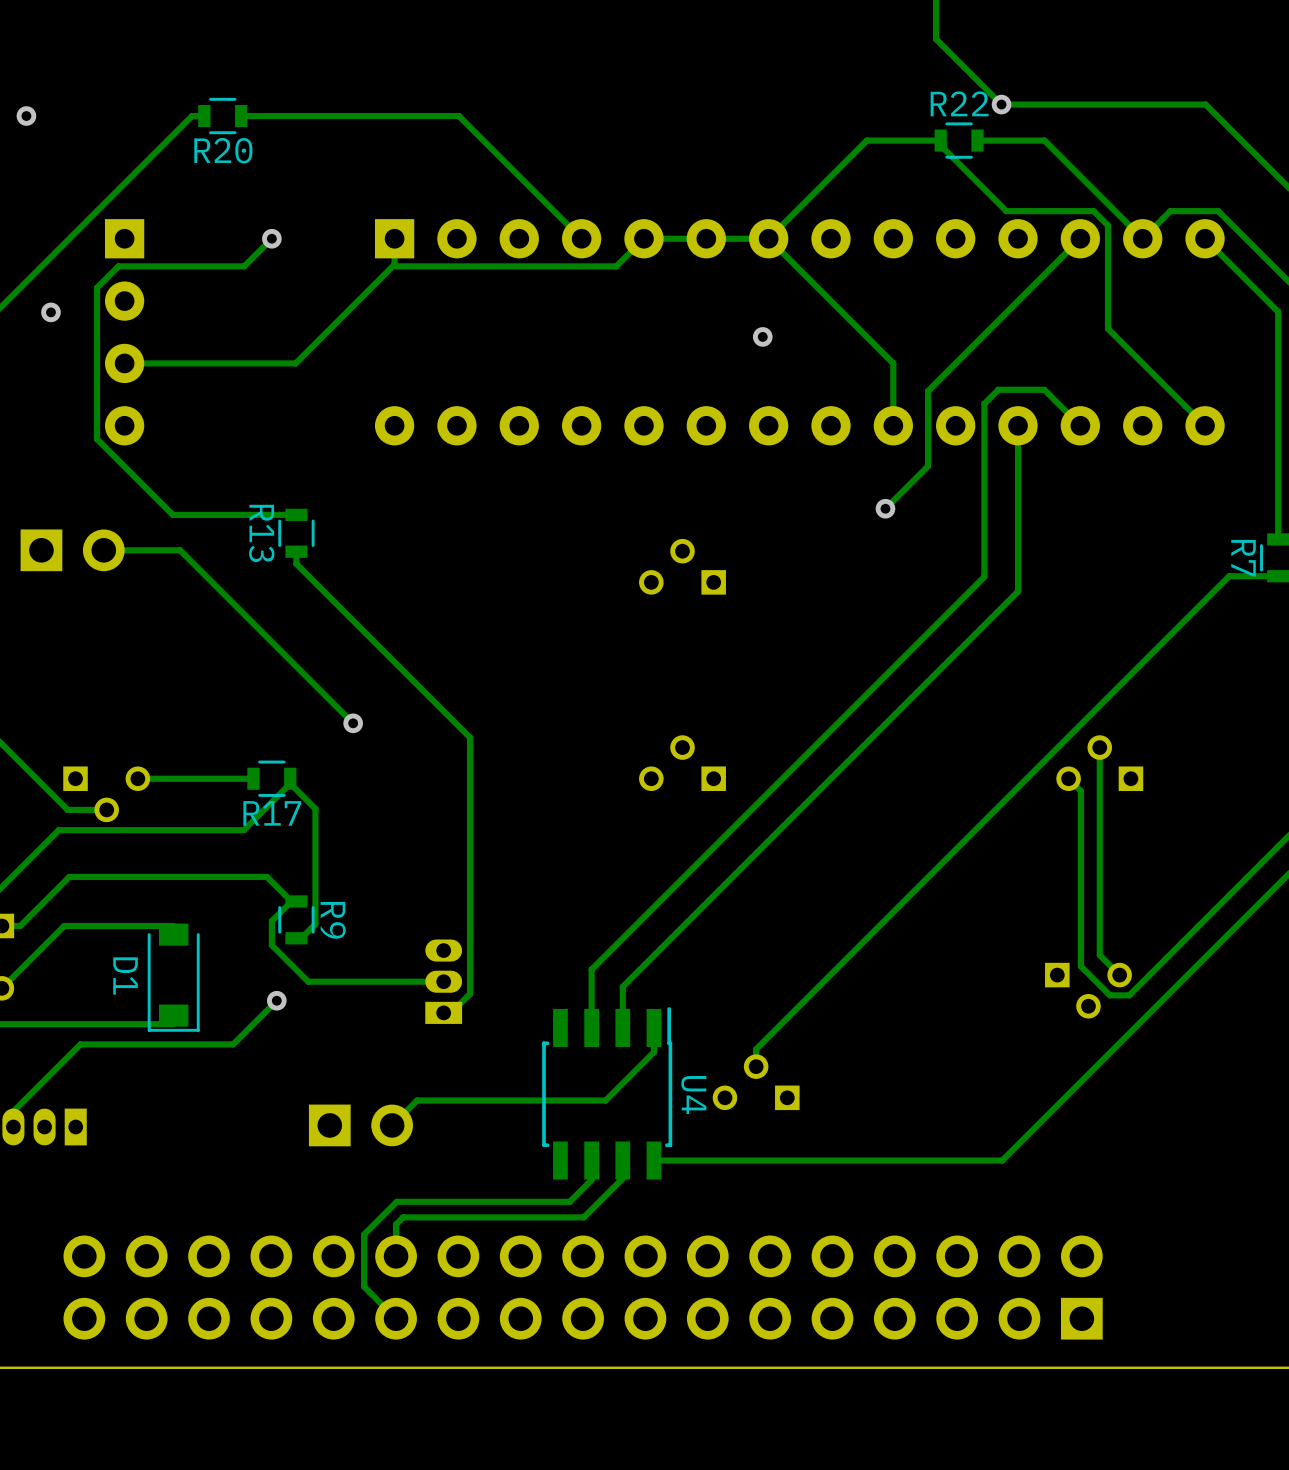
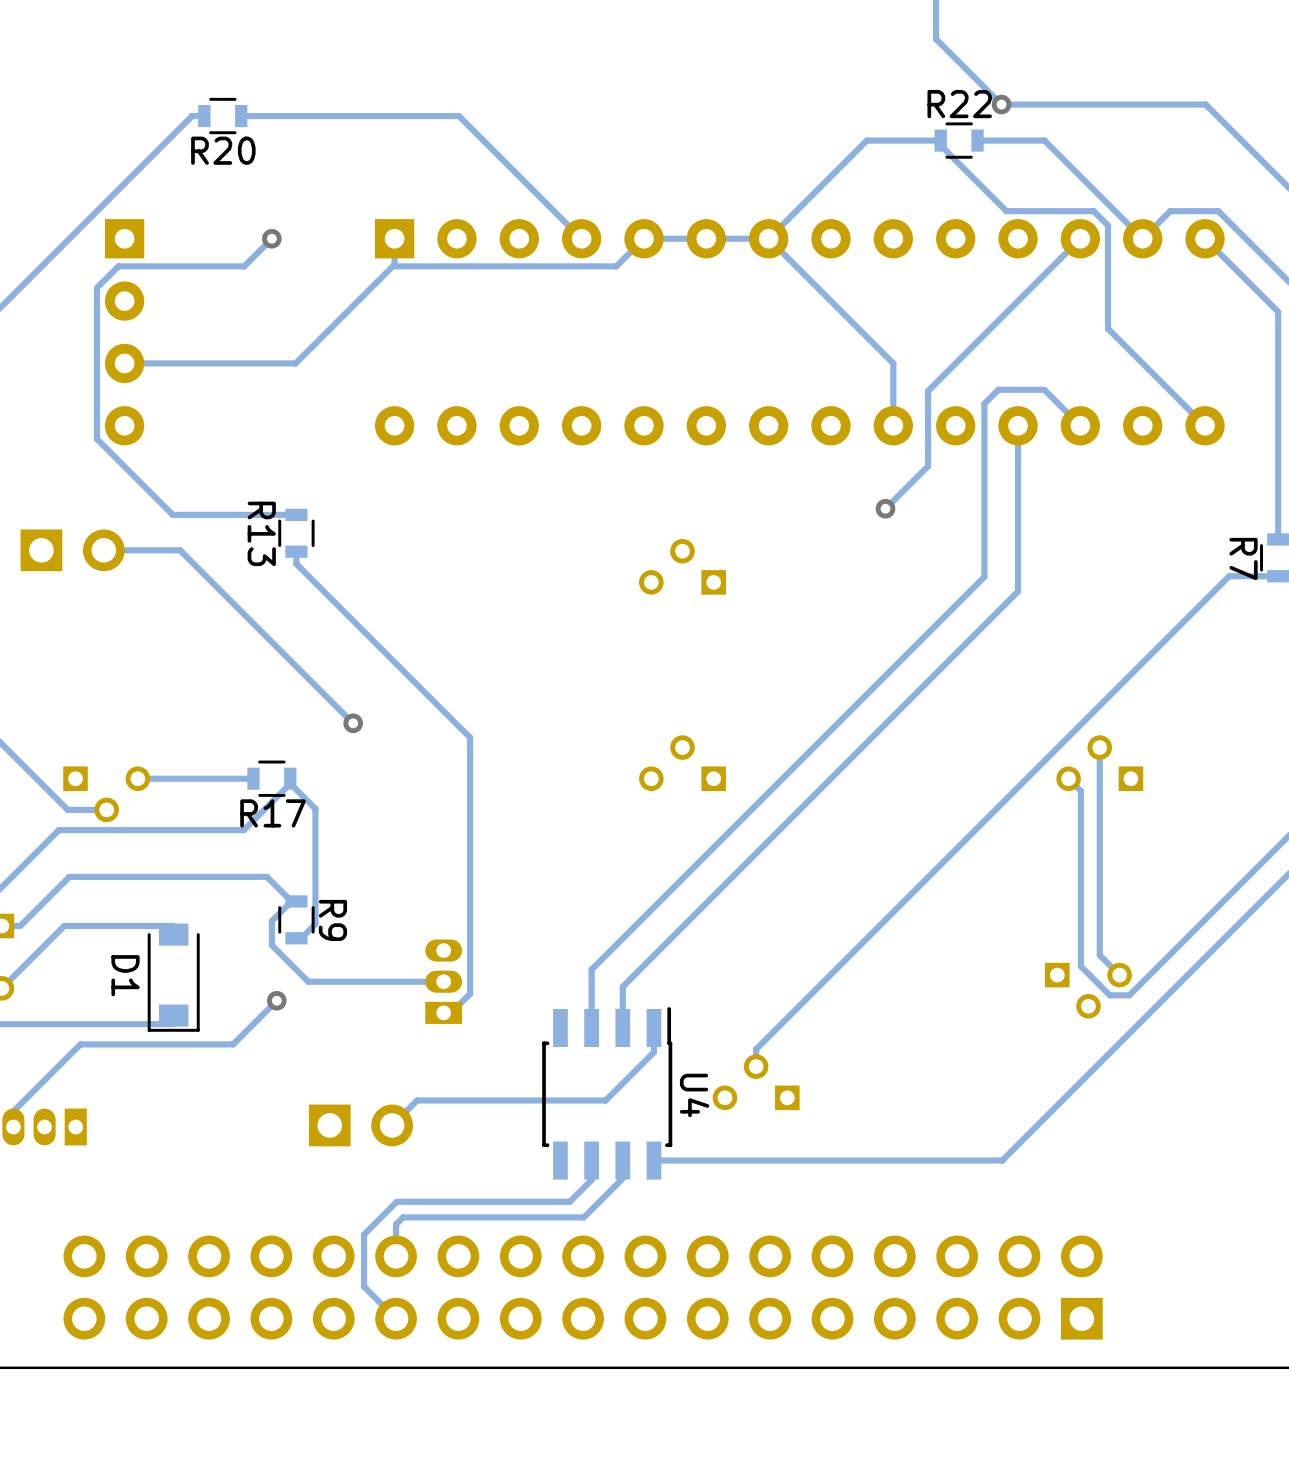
via: (26, 116) -> none
via: (50, 312) -> none
via: (762, 336) -> none

